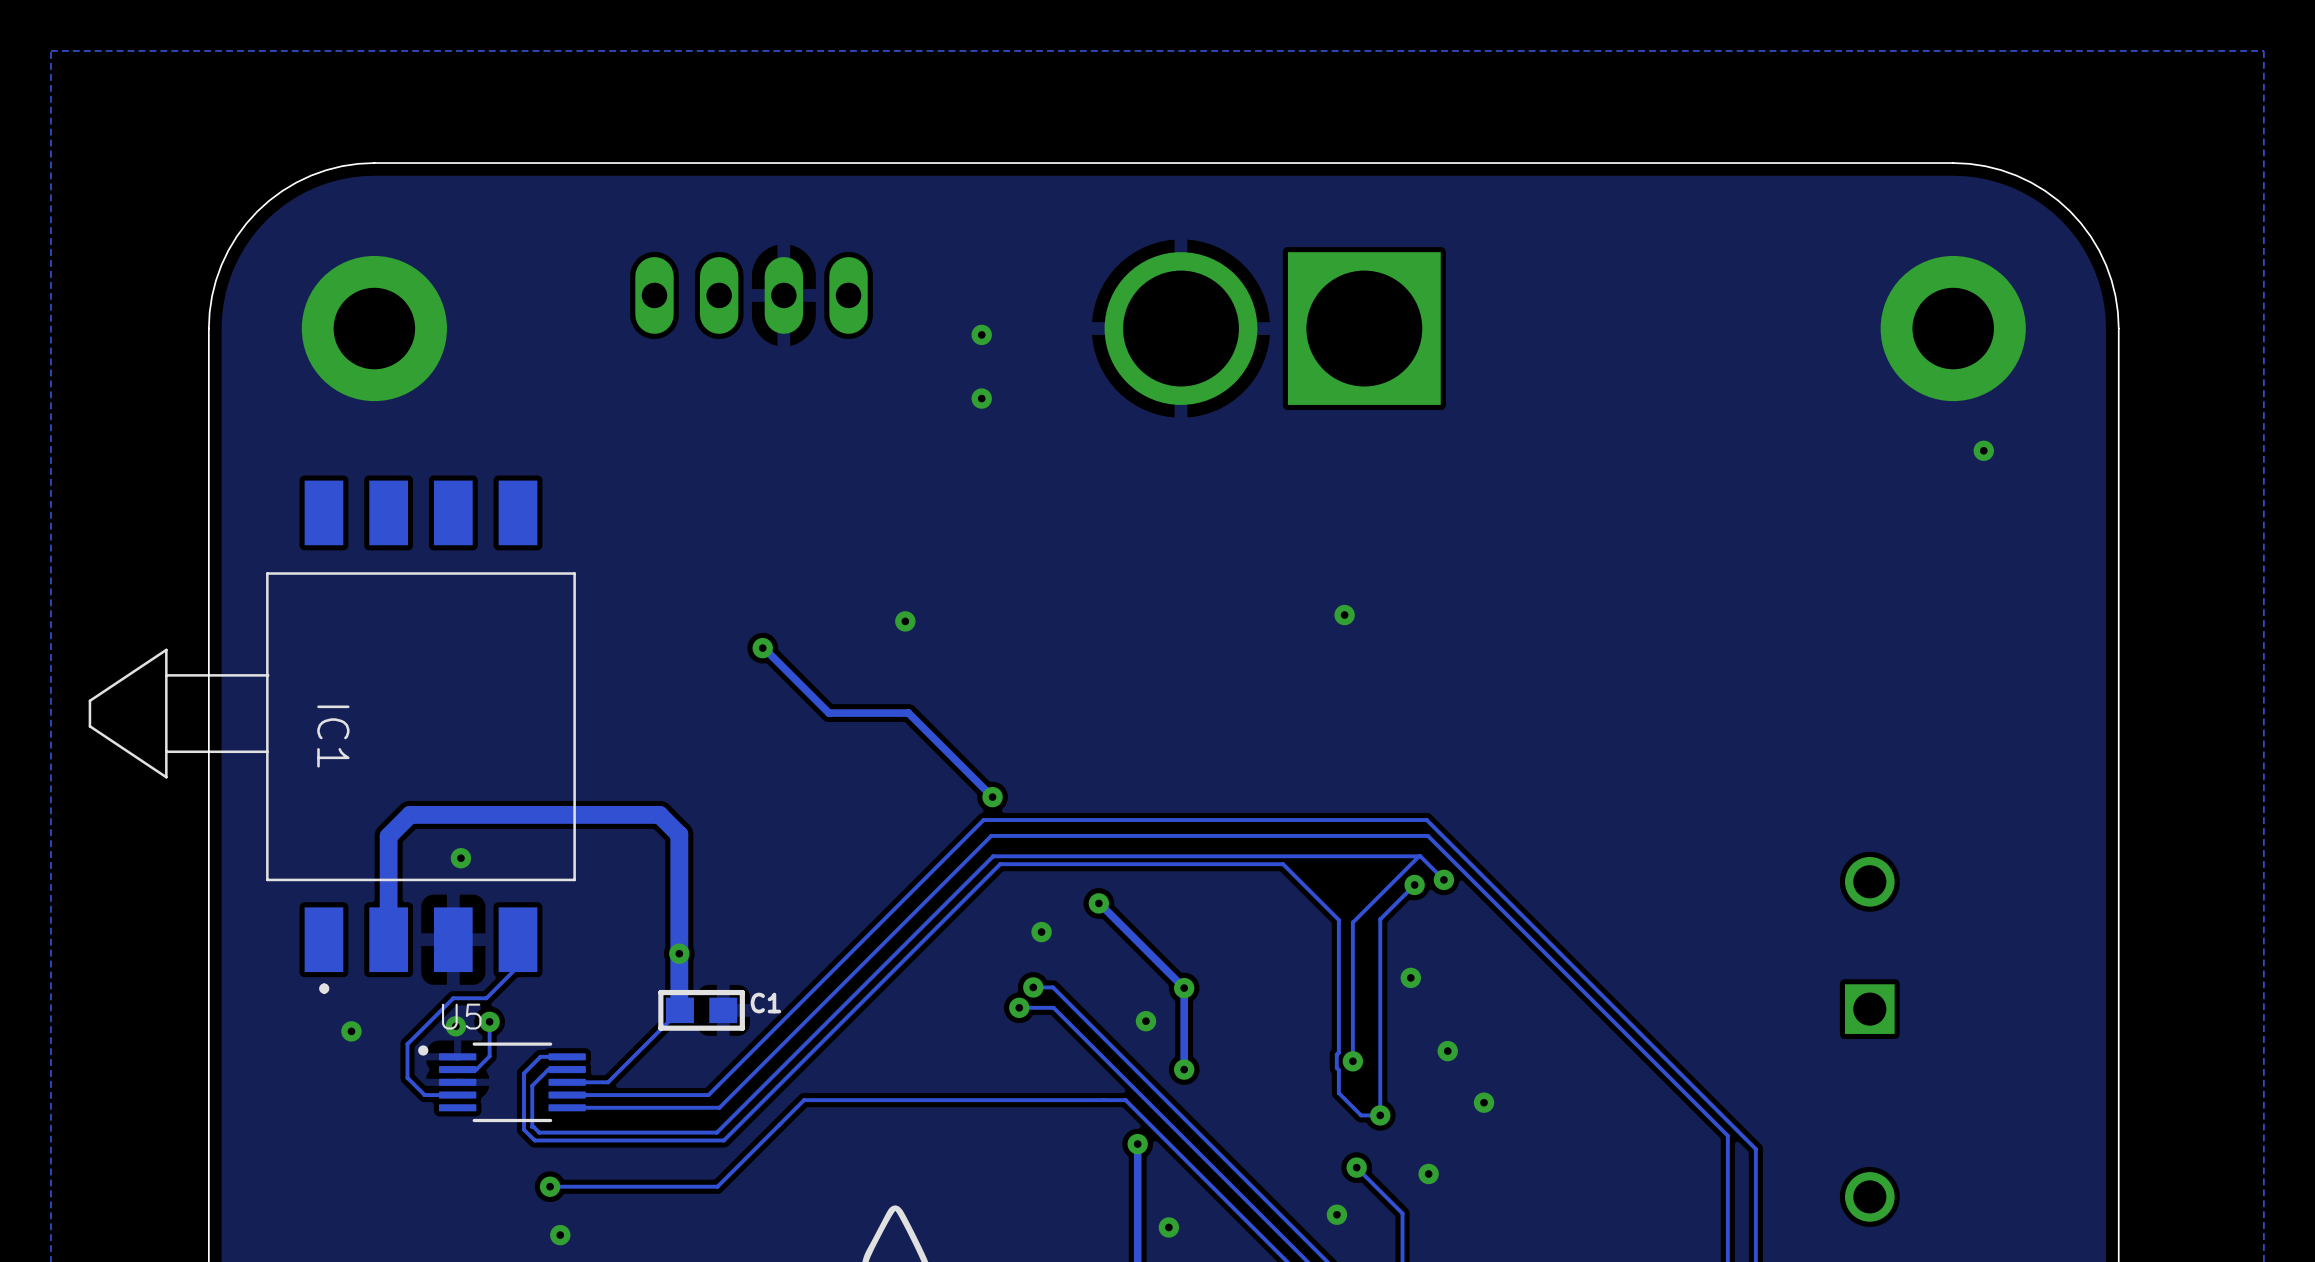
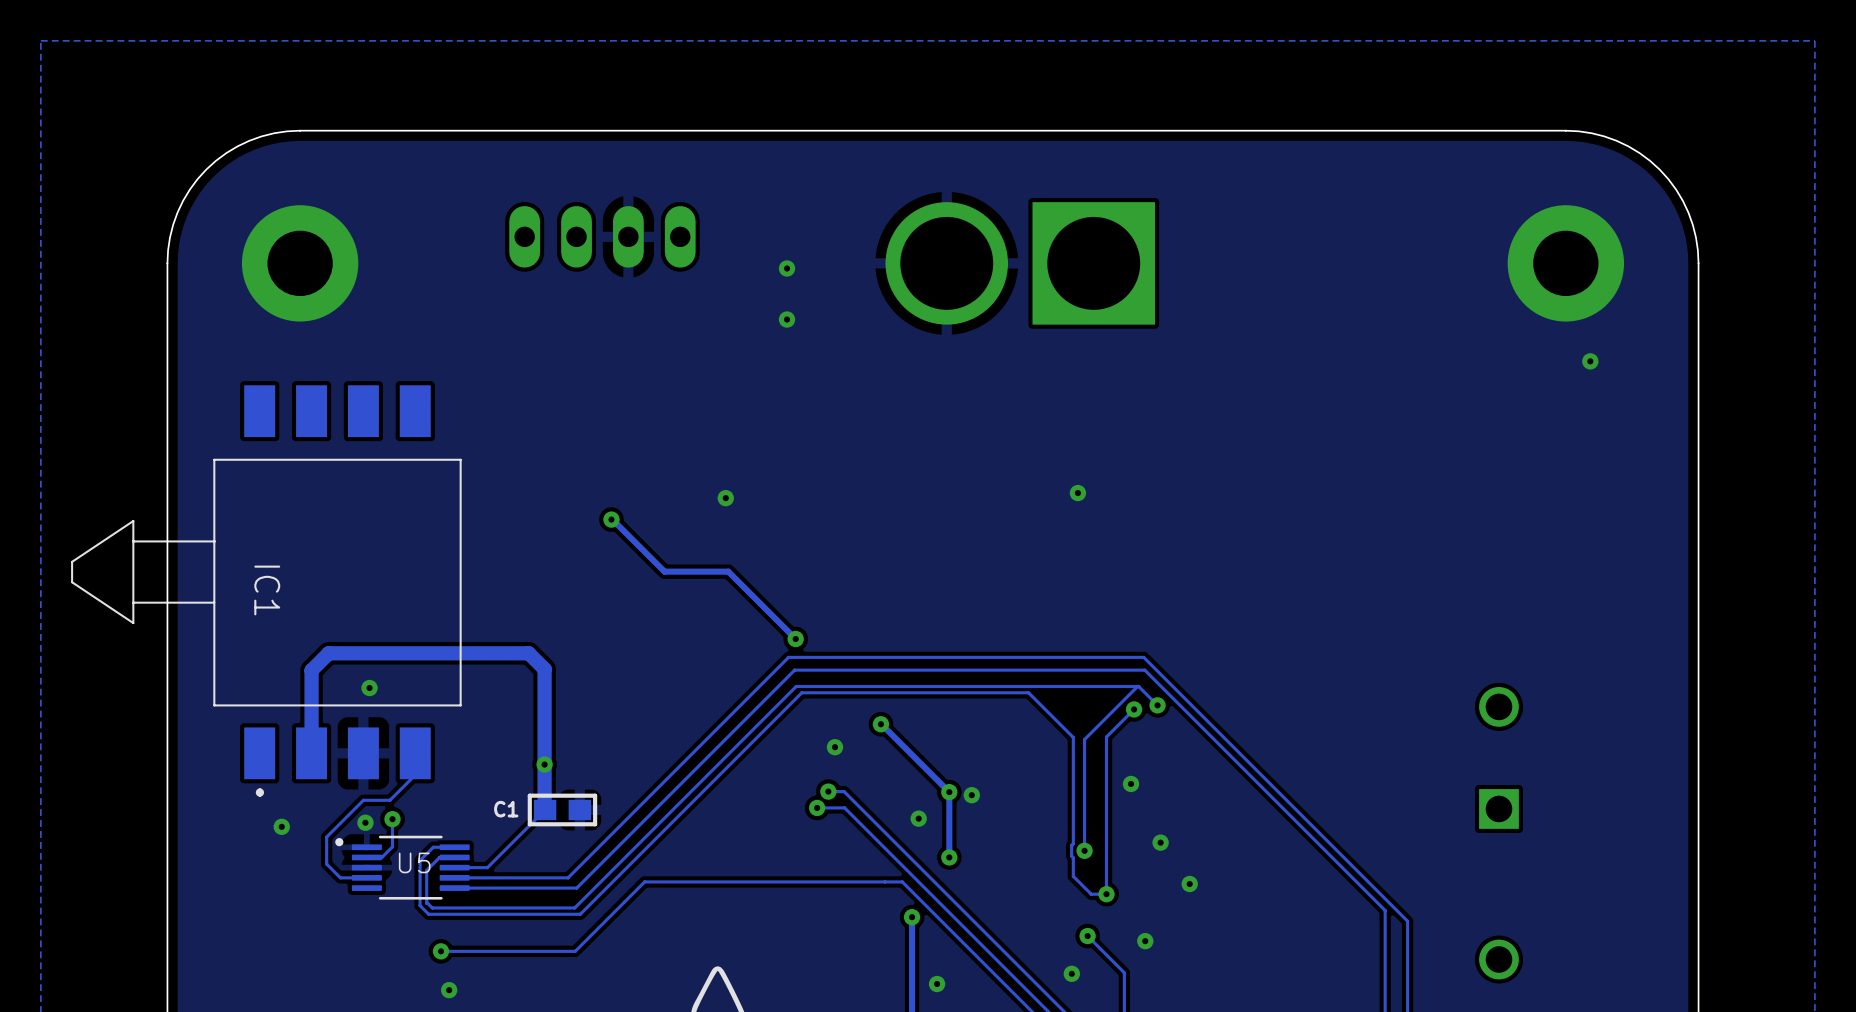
via: none -> (971, 795)
C1 name position: C1 (765, 1003) -> C1 (506, 809)
U5 name position: U5 (461, 1016) -> U5 (414, 862)

